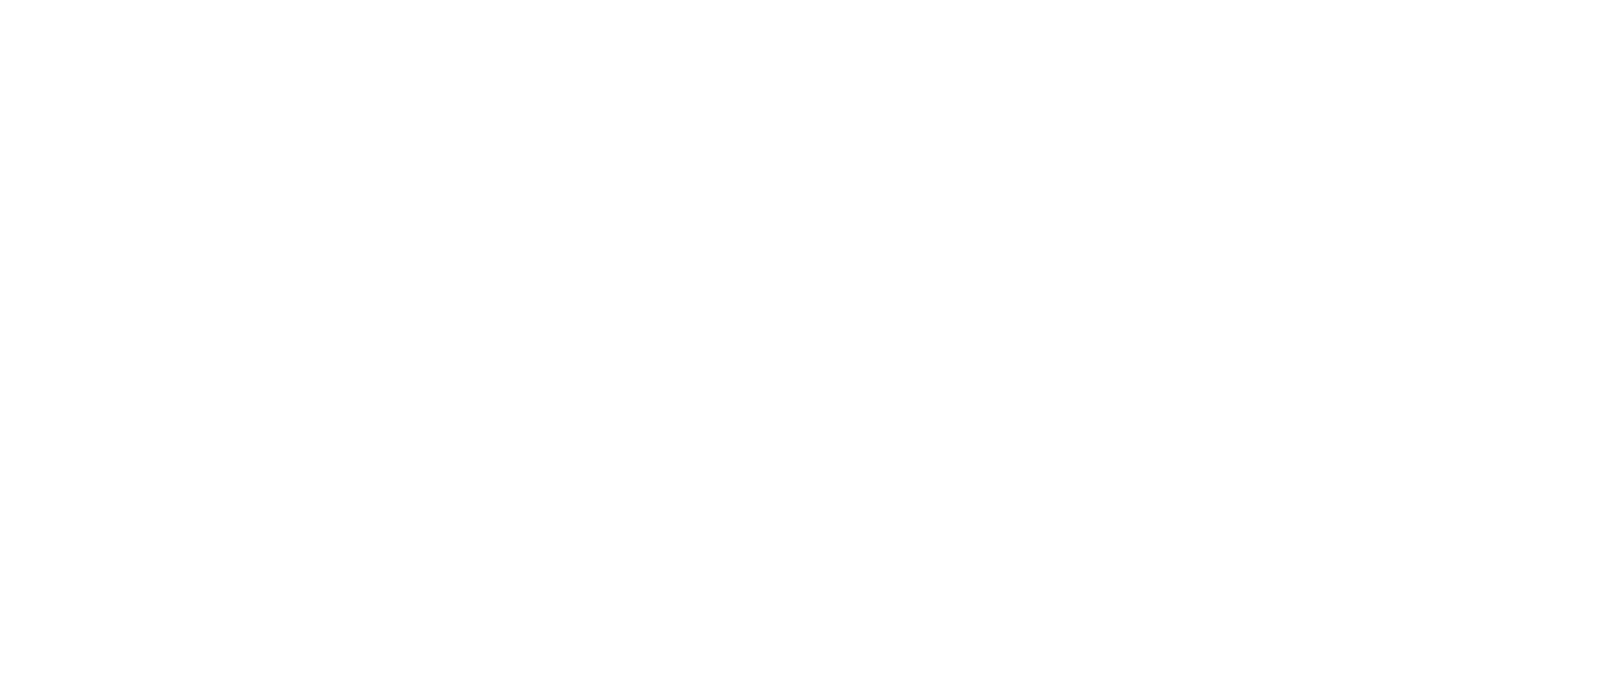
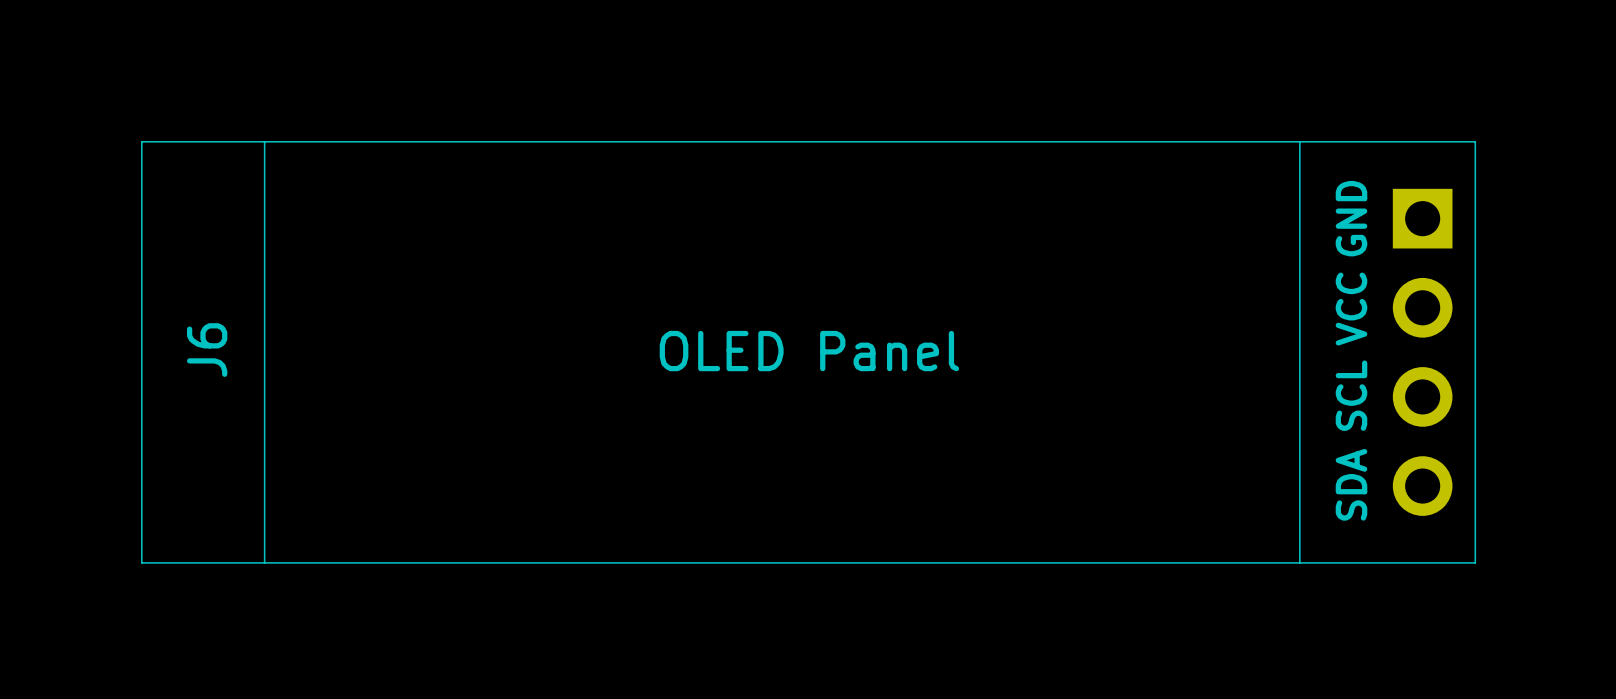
J6: none -> (808, 352)

